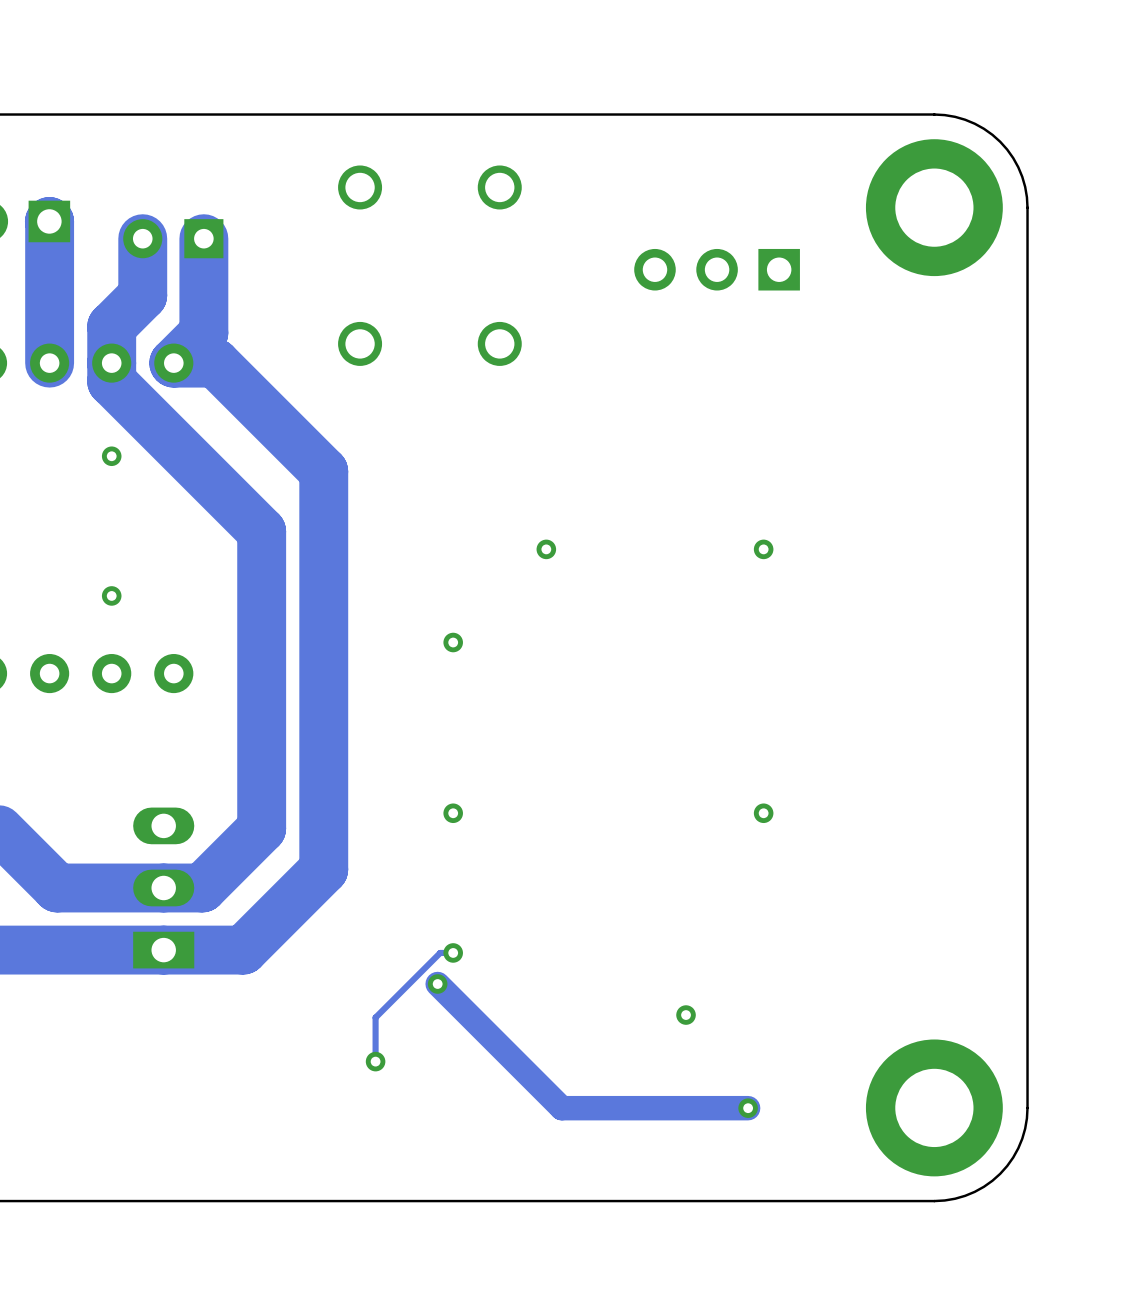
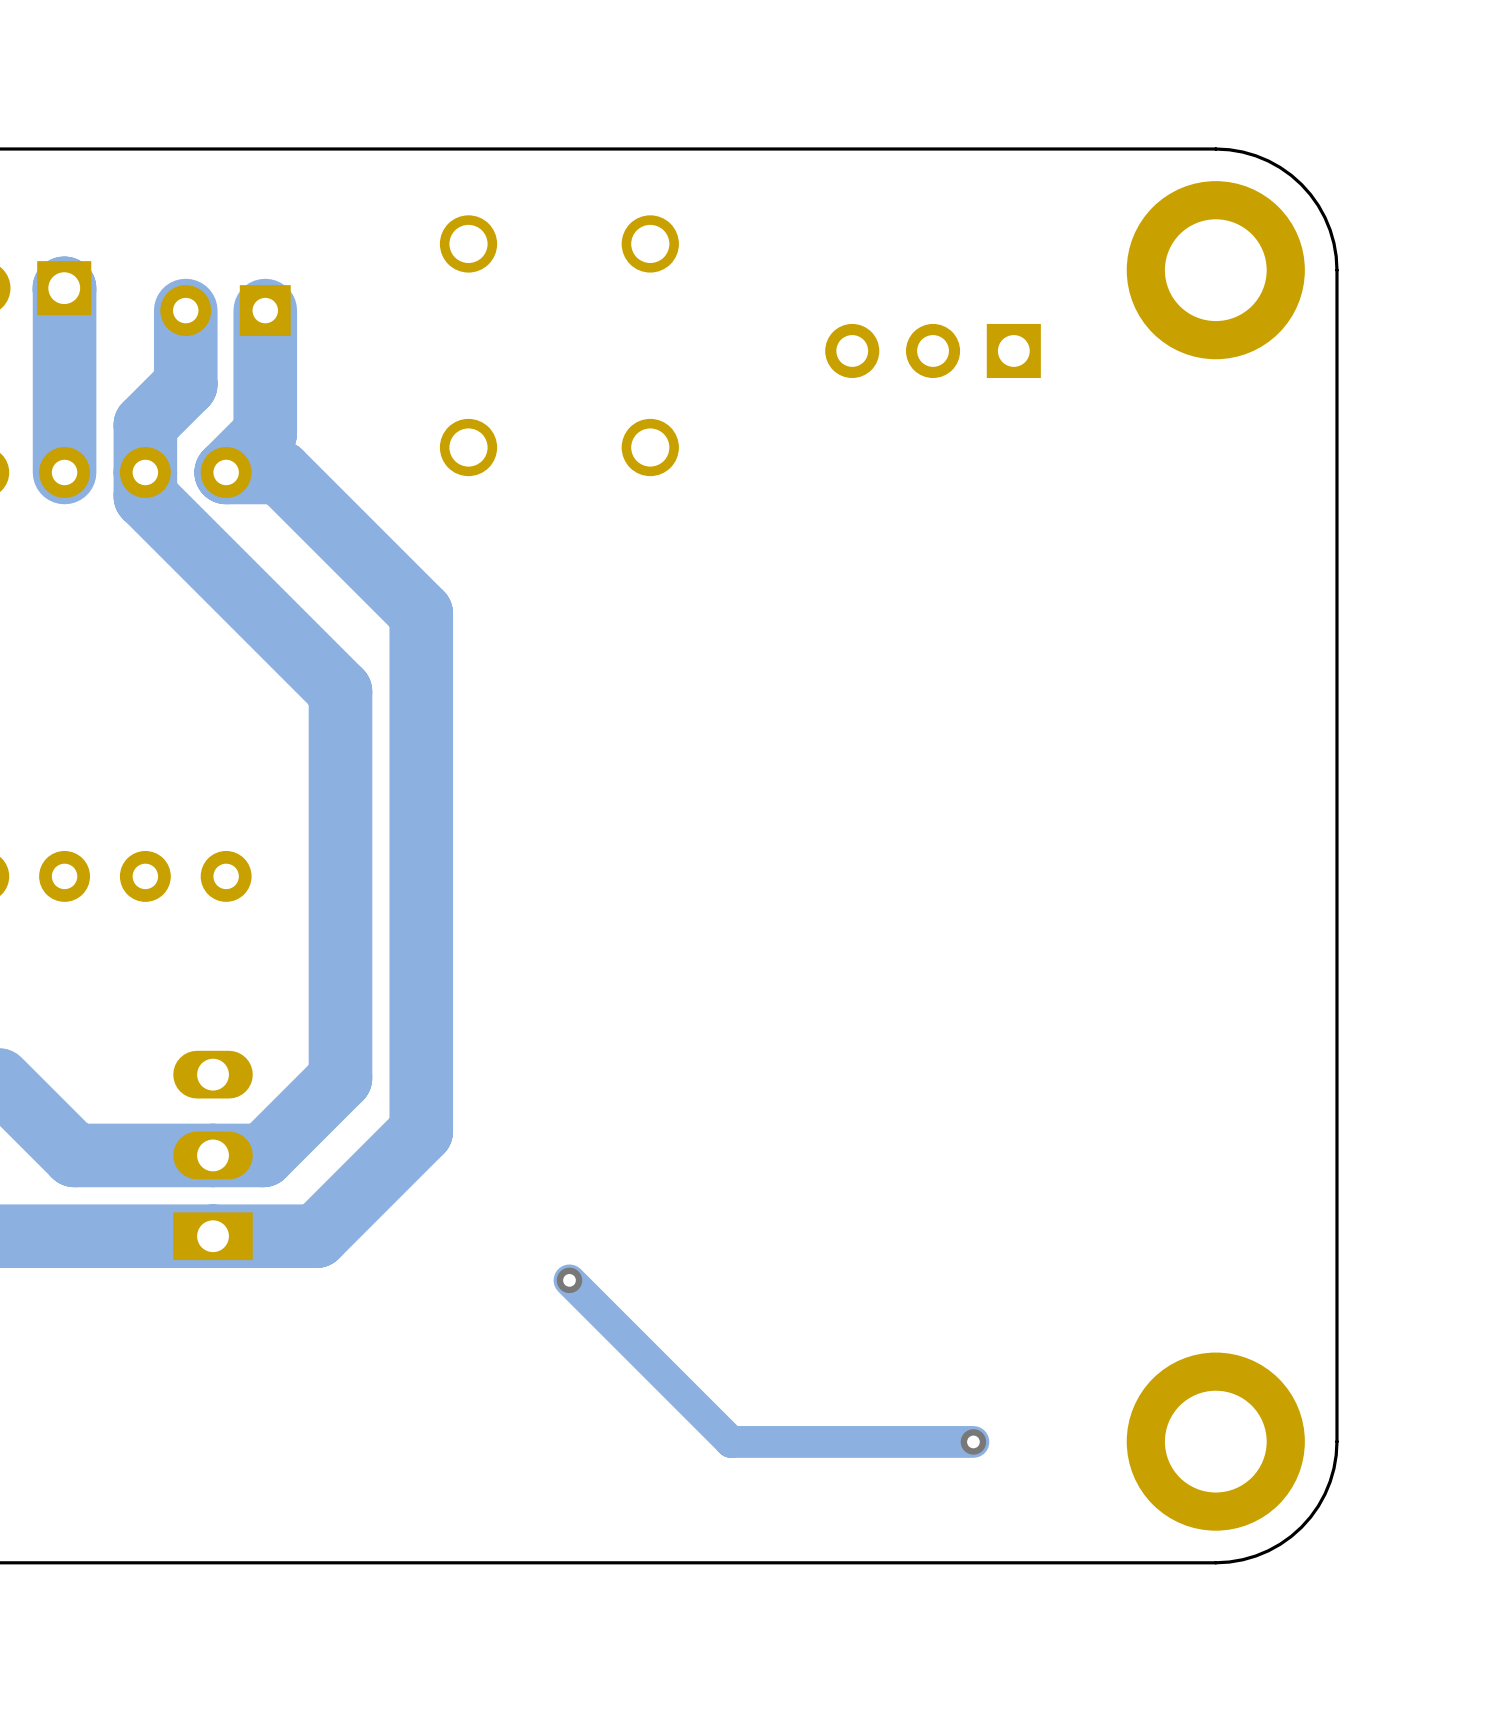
via: (111, 456) -> none
via: (546, 549) -> none
via: (763, 549) -> none
via: (111, 595) -> none
via: (453, 642) -> none
via: (453, 813) -> none
via: (763, 813) -> none
track: (453, 952) (440, 952) (375, 1017) (375, 1061) -> none
via: (453, 952) -> none
via: (686, 1015) -> none
via: (375, 1061) -> none

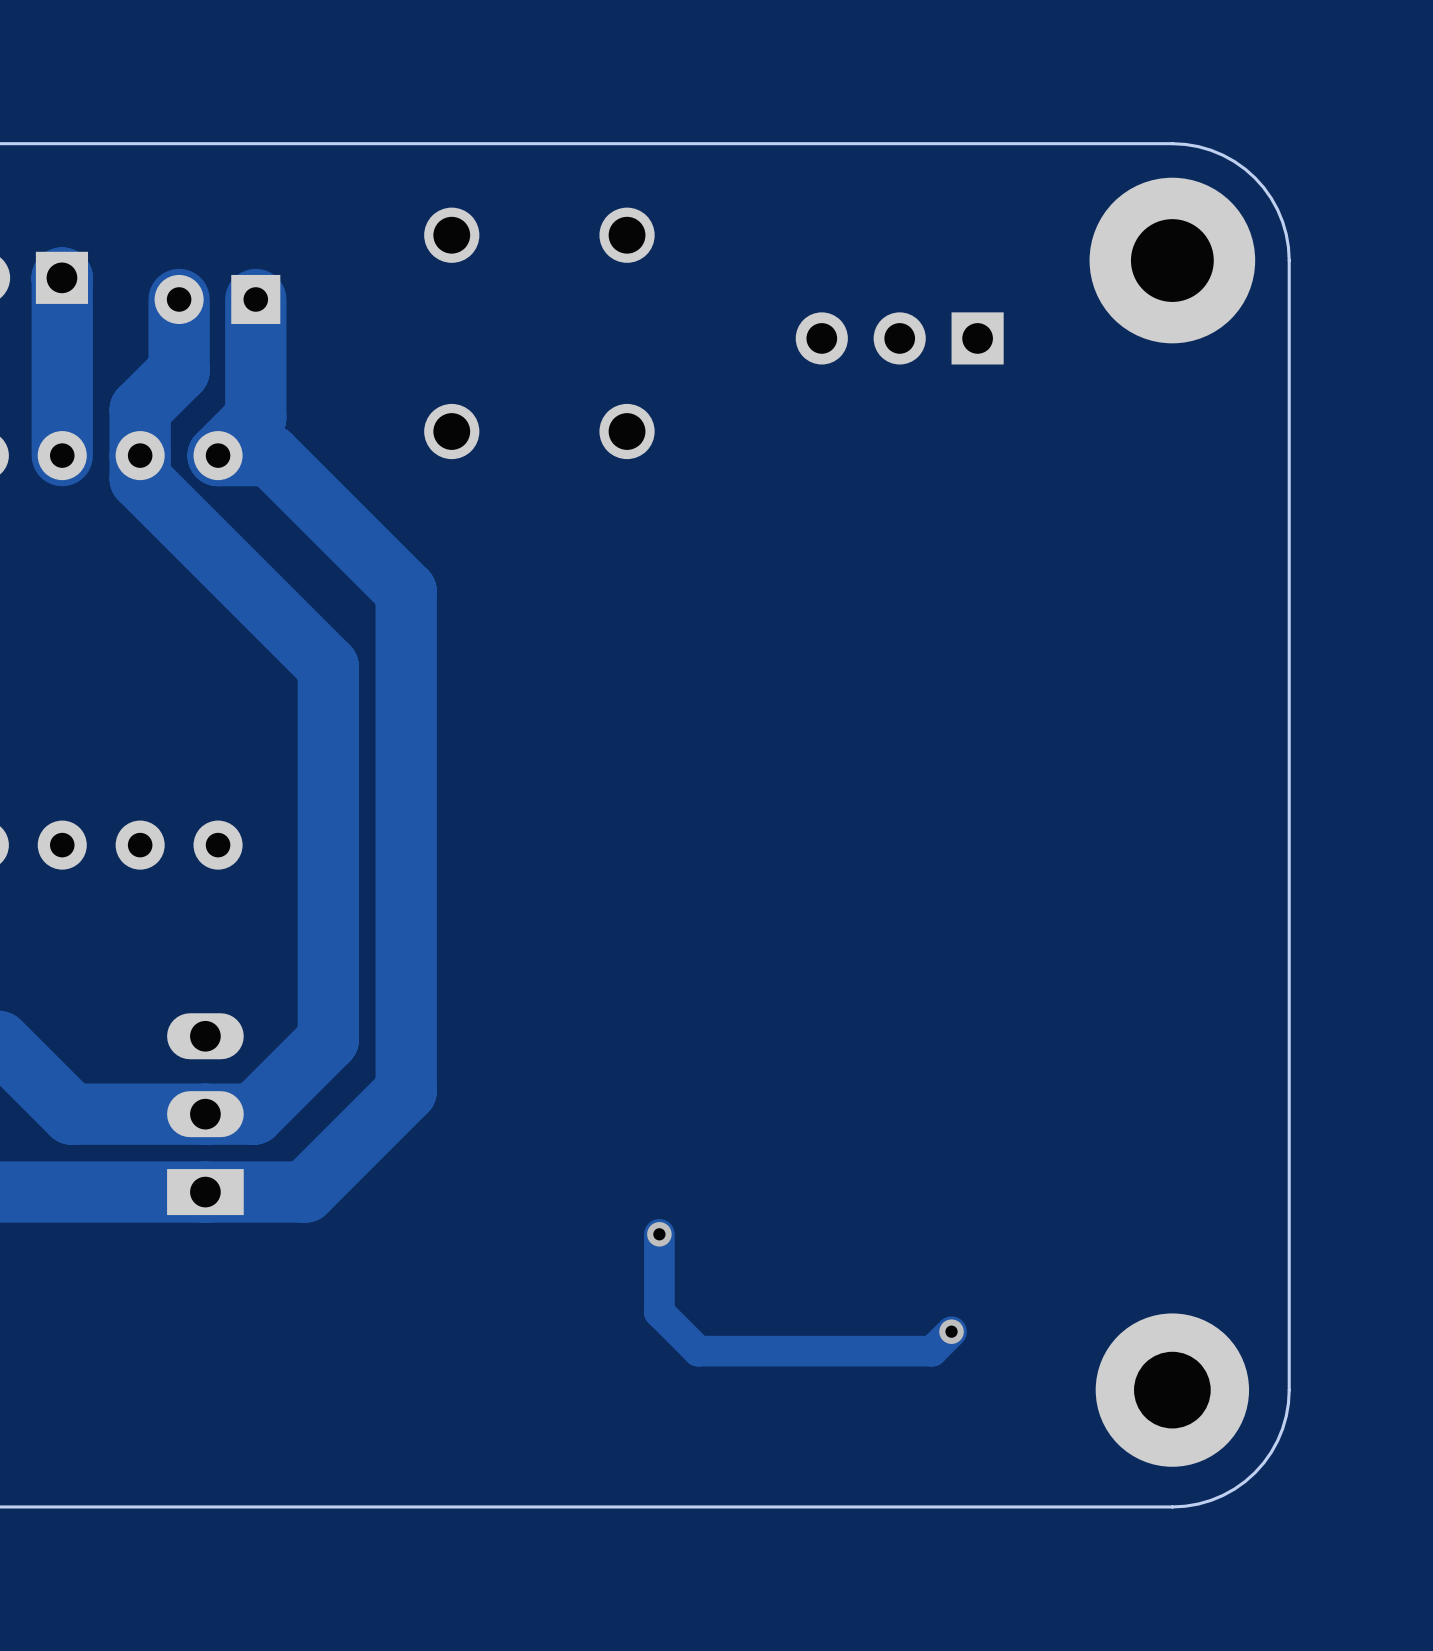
part footprint: [1126, 181, 1305, 360] -> [1089, 177, 1256, 344]
track: (569, 1280) (731, 1441) (973, 1441) -> none
via position: (569, 1280) -> (659, 1234)
track: none -> (659, 1234) (659, 1312) (698, 1351) (932, 1351) (951, 1331)
part footprint: [1126, 1352, 1305, 1531] -> [1095, 1313, 1250, 1467]
via position: (973, 1441) -> (951, 1331)

